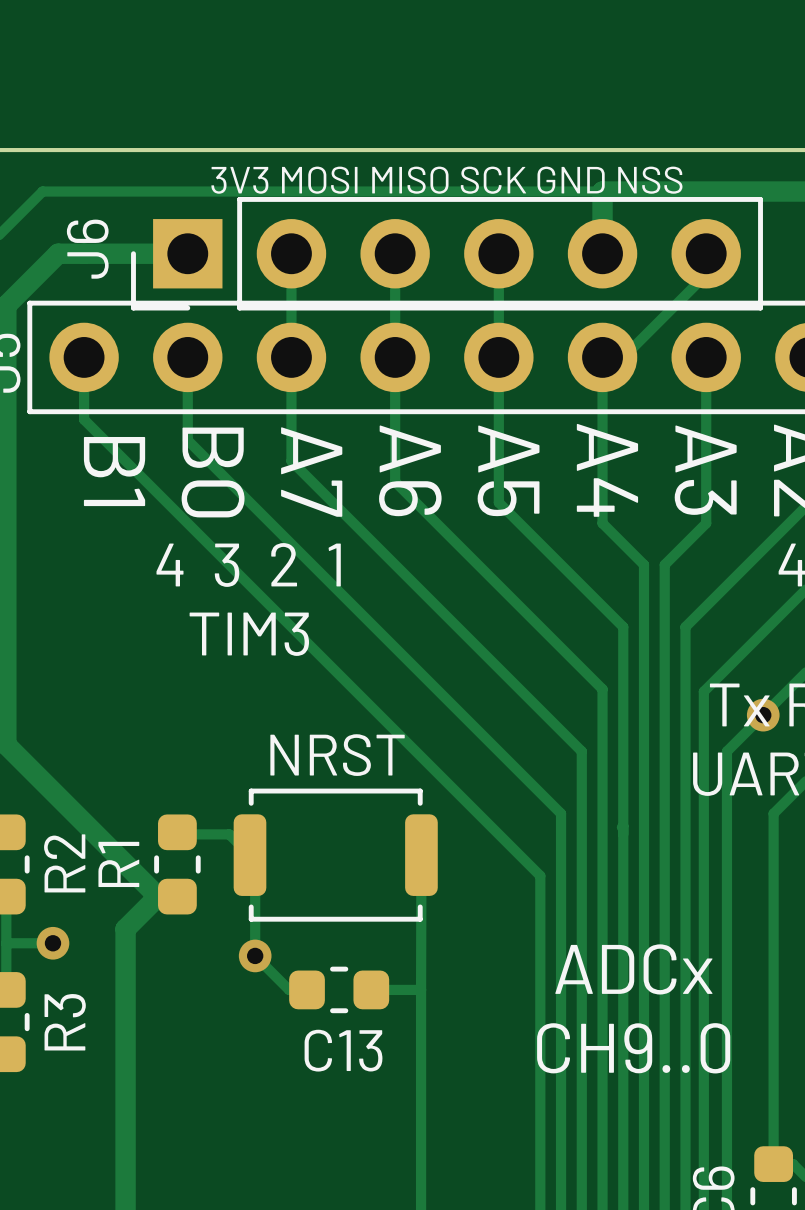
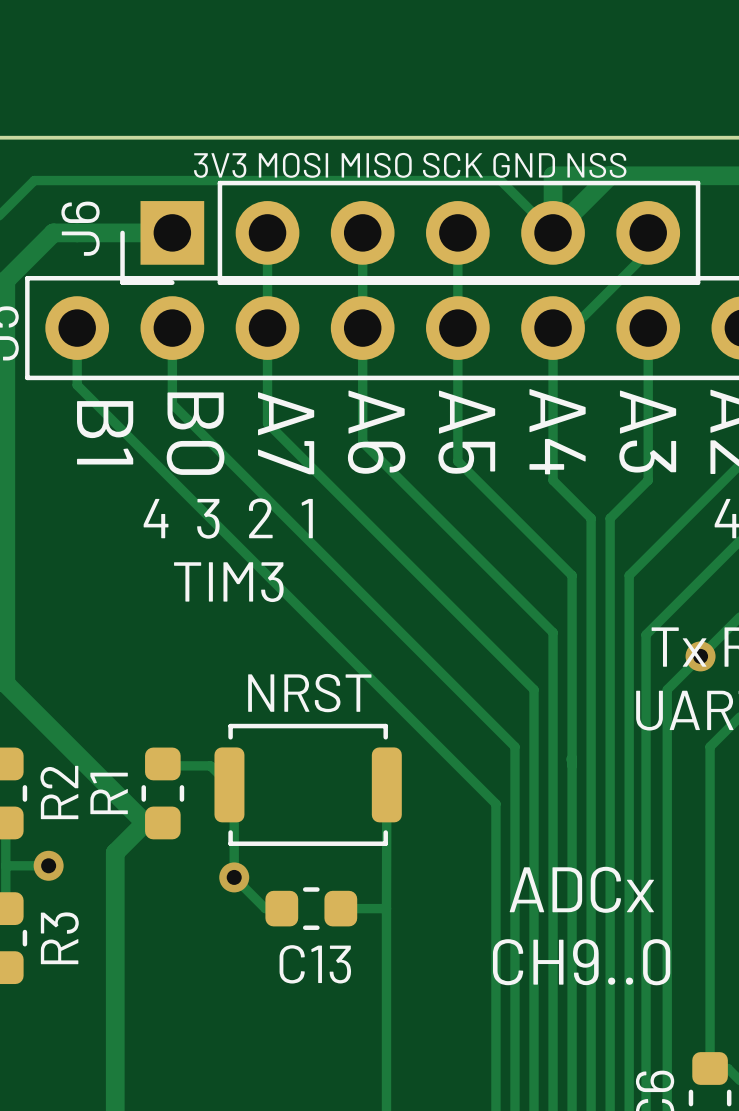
track: (602, 191) (42, 191) (37, 196) -> (610, 175) (553, 232) (500, 180) (34, 180)

